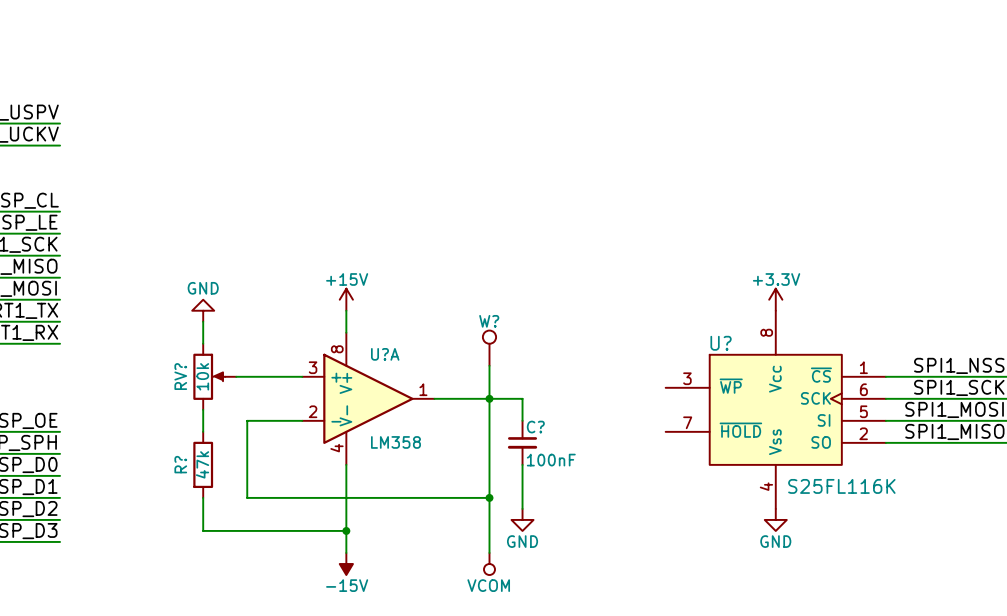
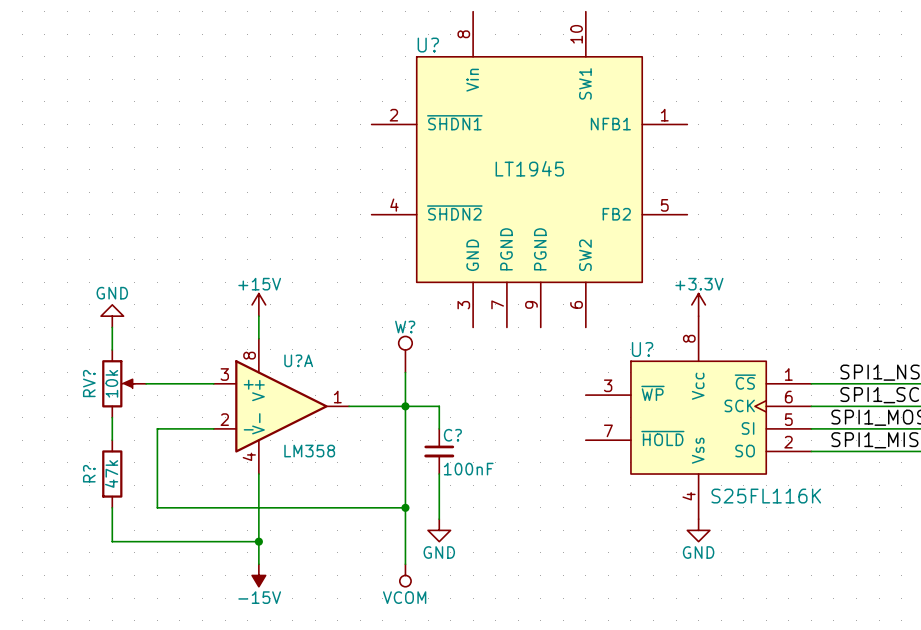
U?: none -> LT1945 (529, 169)

